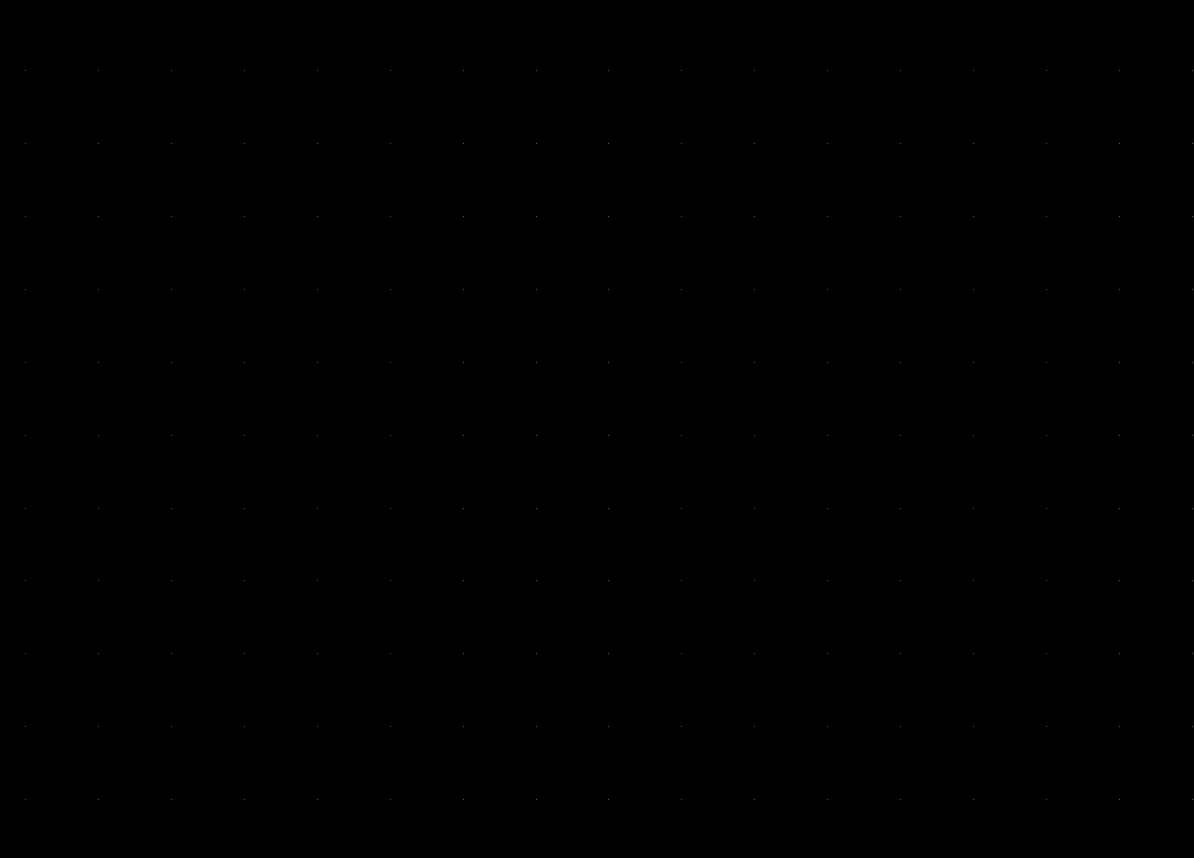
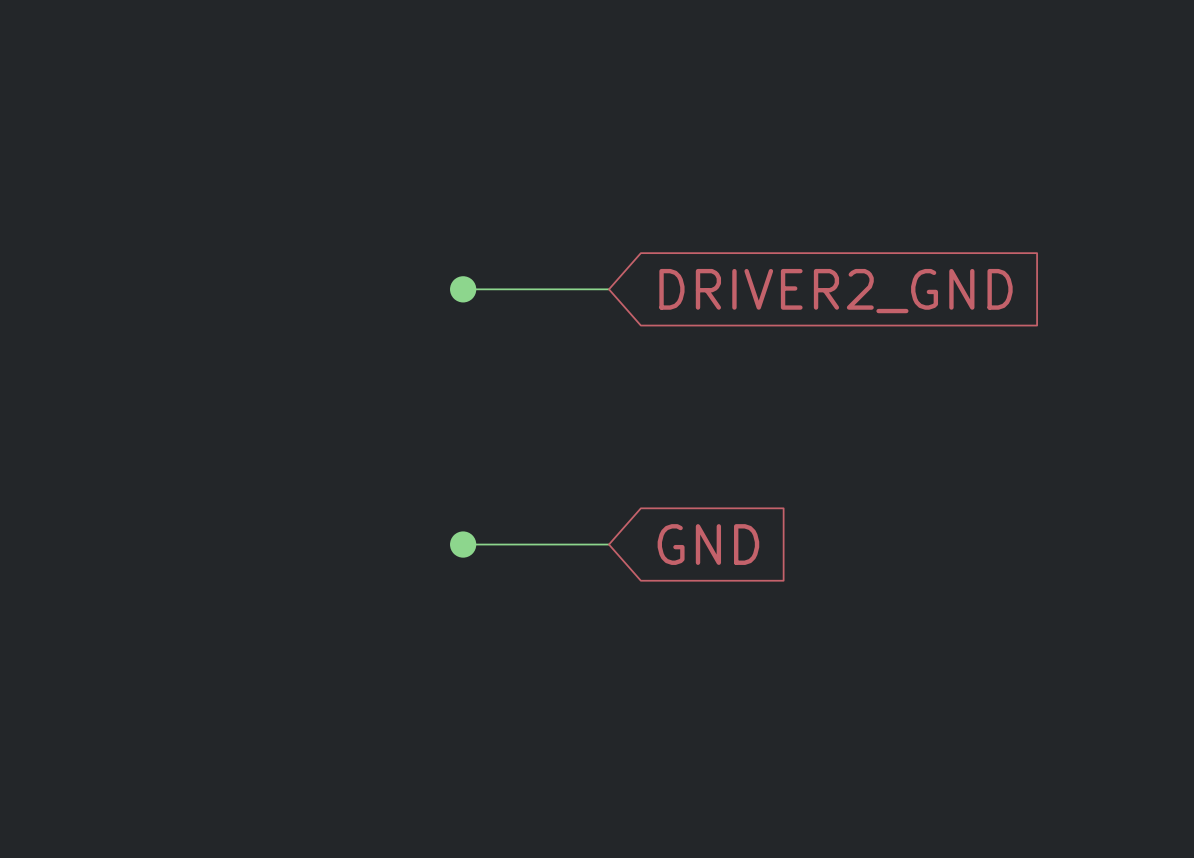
wire: none -> (463, 289) (608, 289)
junction: none -> (463, 289)
global label: none -> DRIVER2_GND (836, 291)
wire: none -> (463, 544) (608, 544)
junction: none -> (463, 544)
global label: none -> GND (708, 544)

